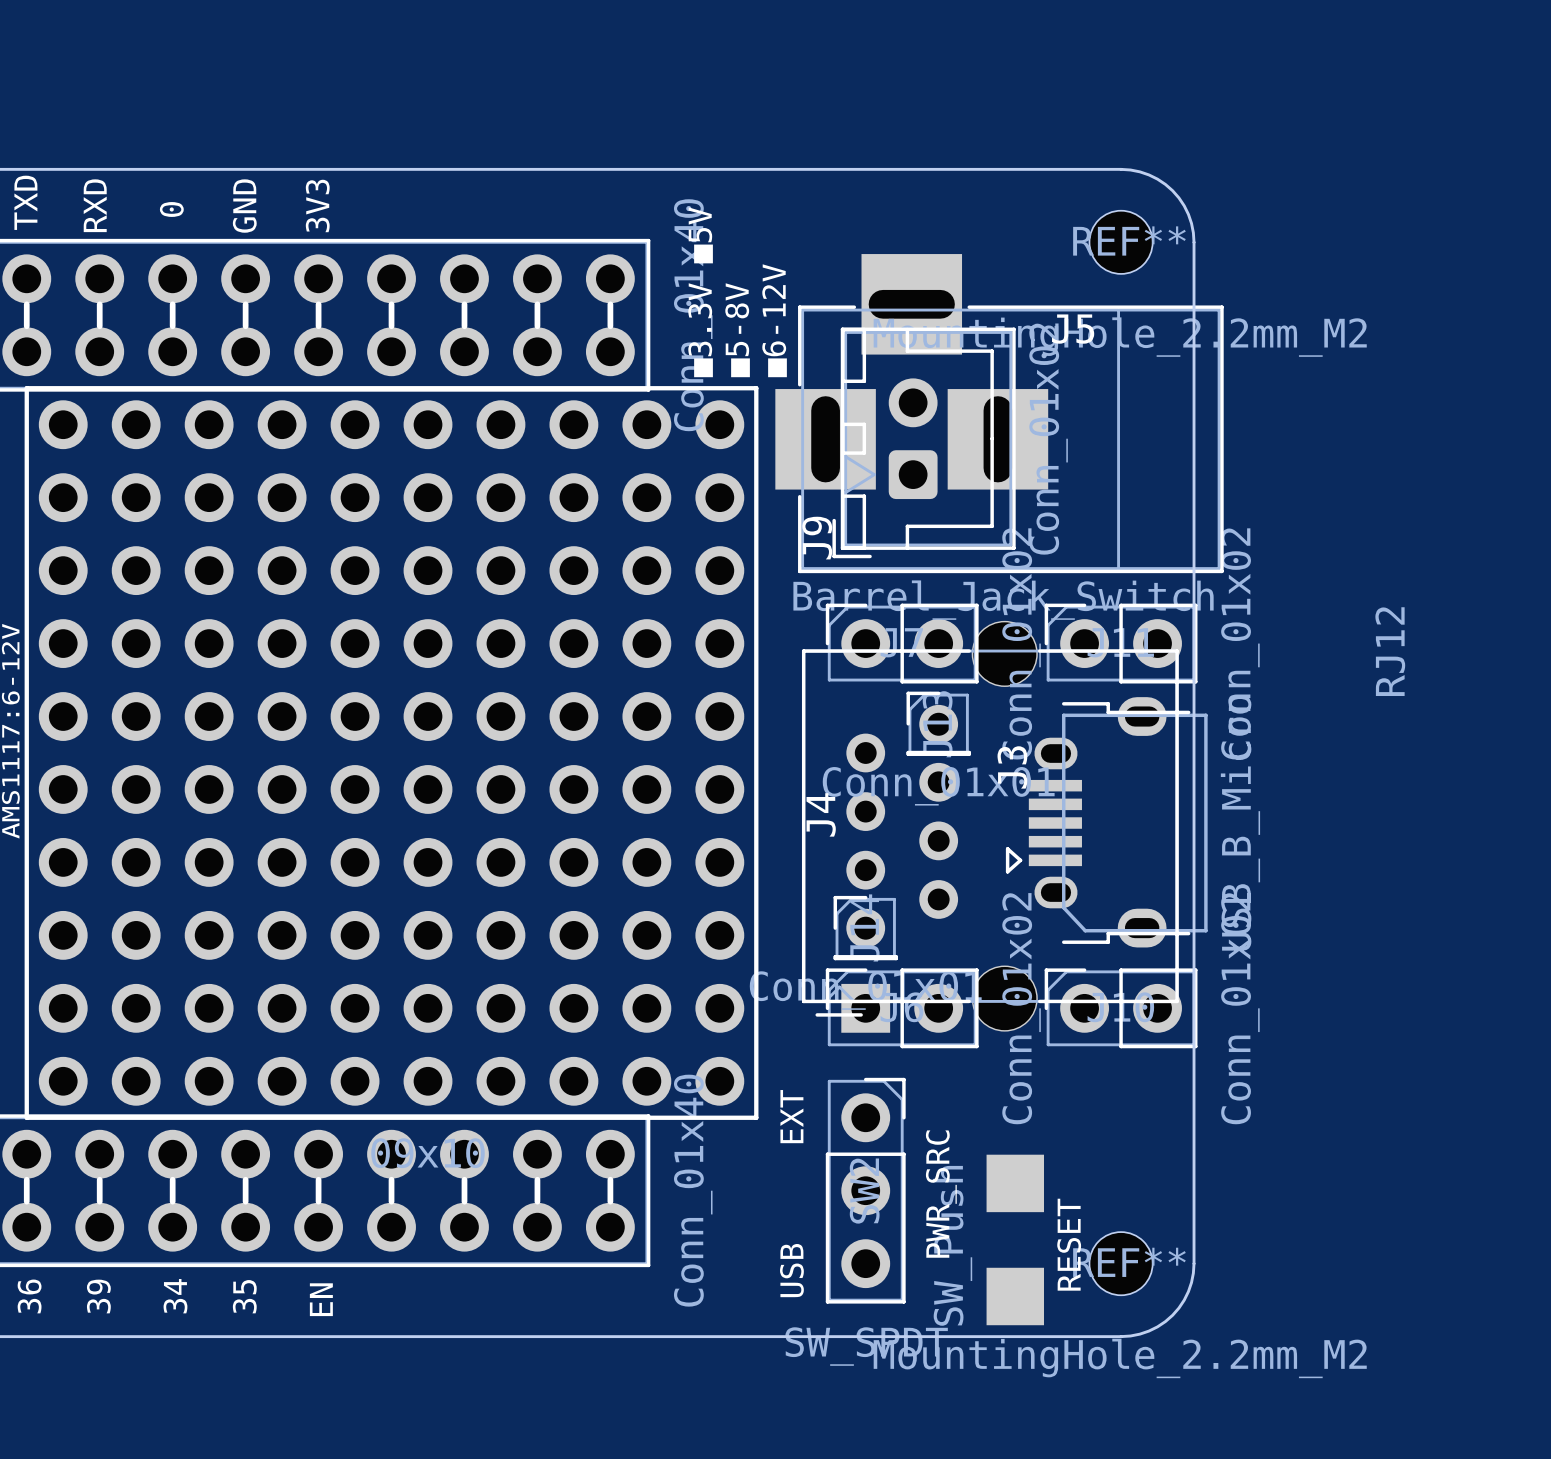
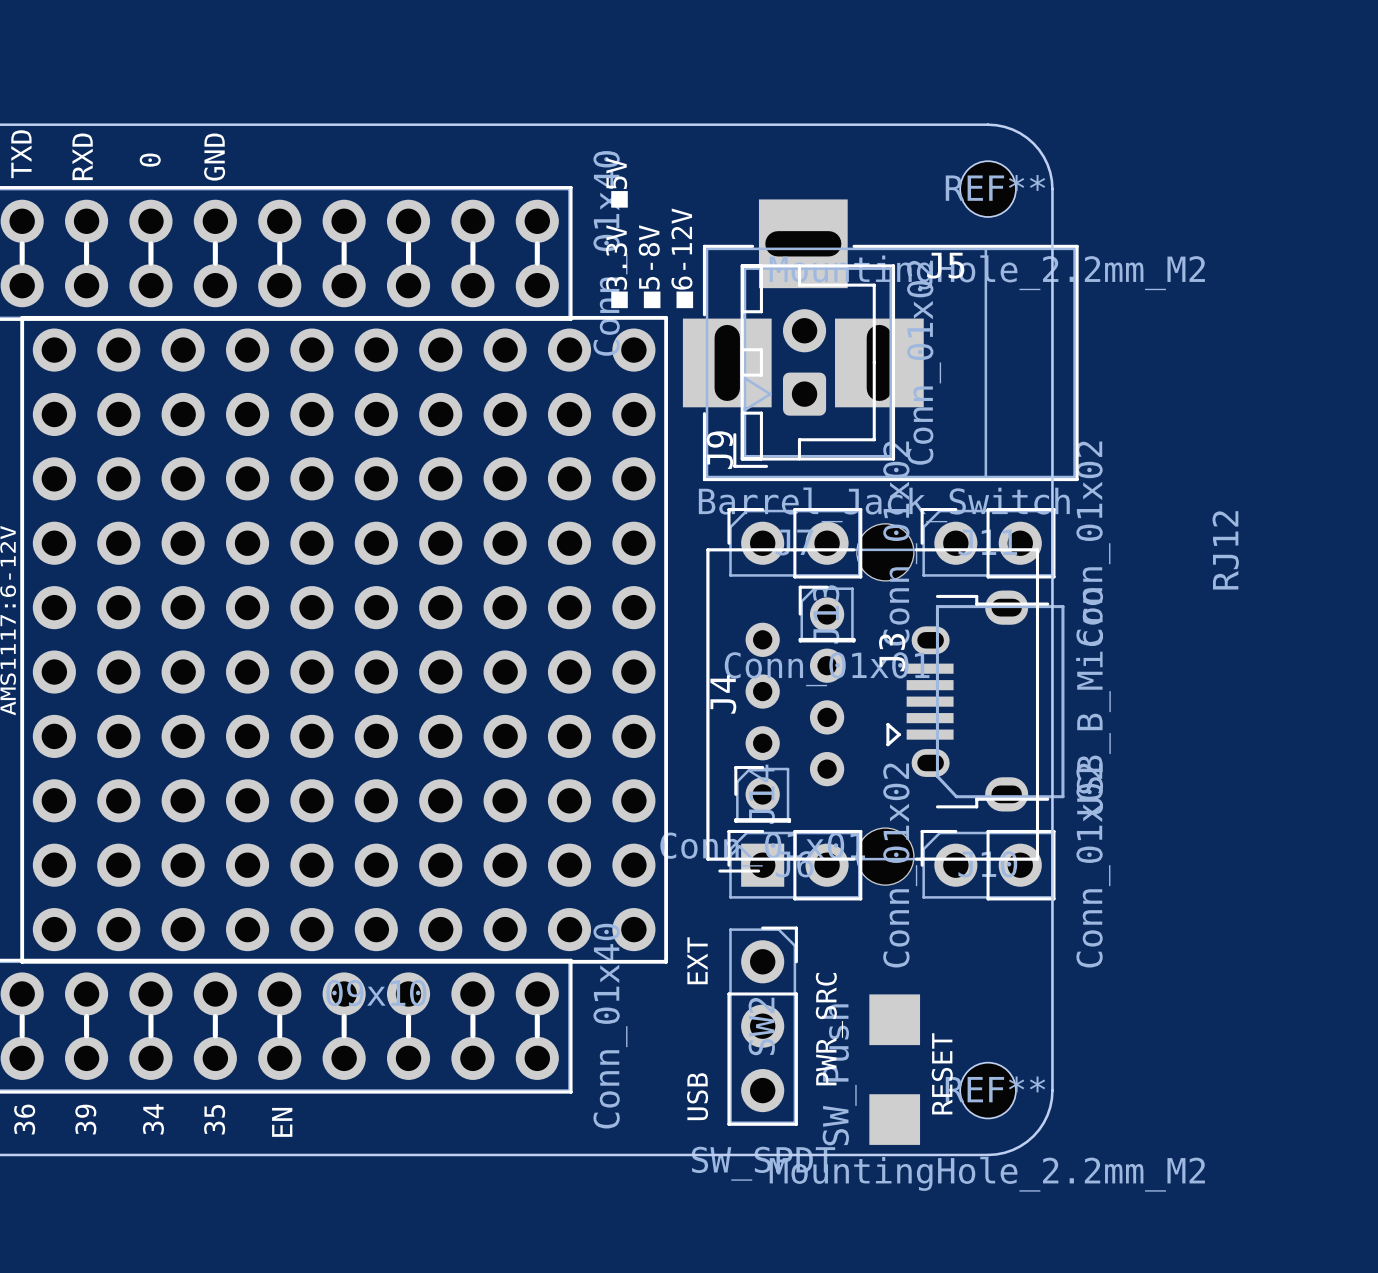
text: 3V3 (317, 205) -> none

